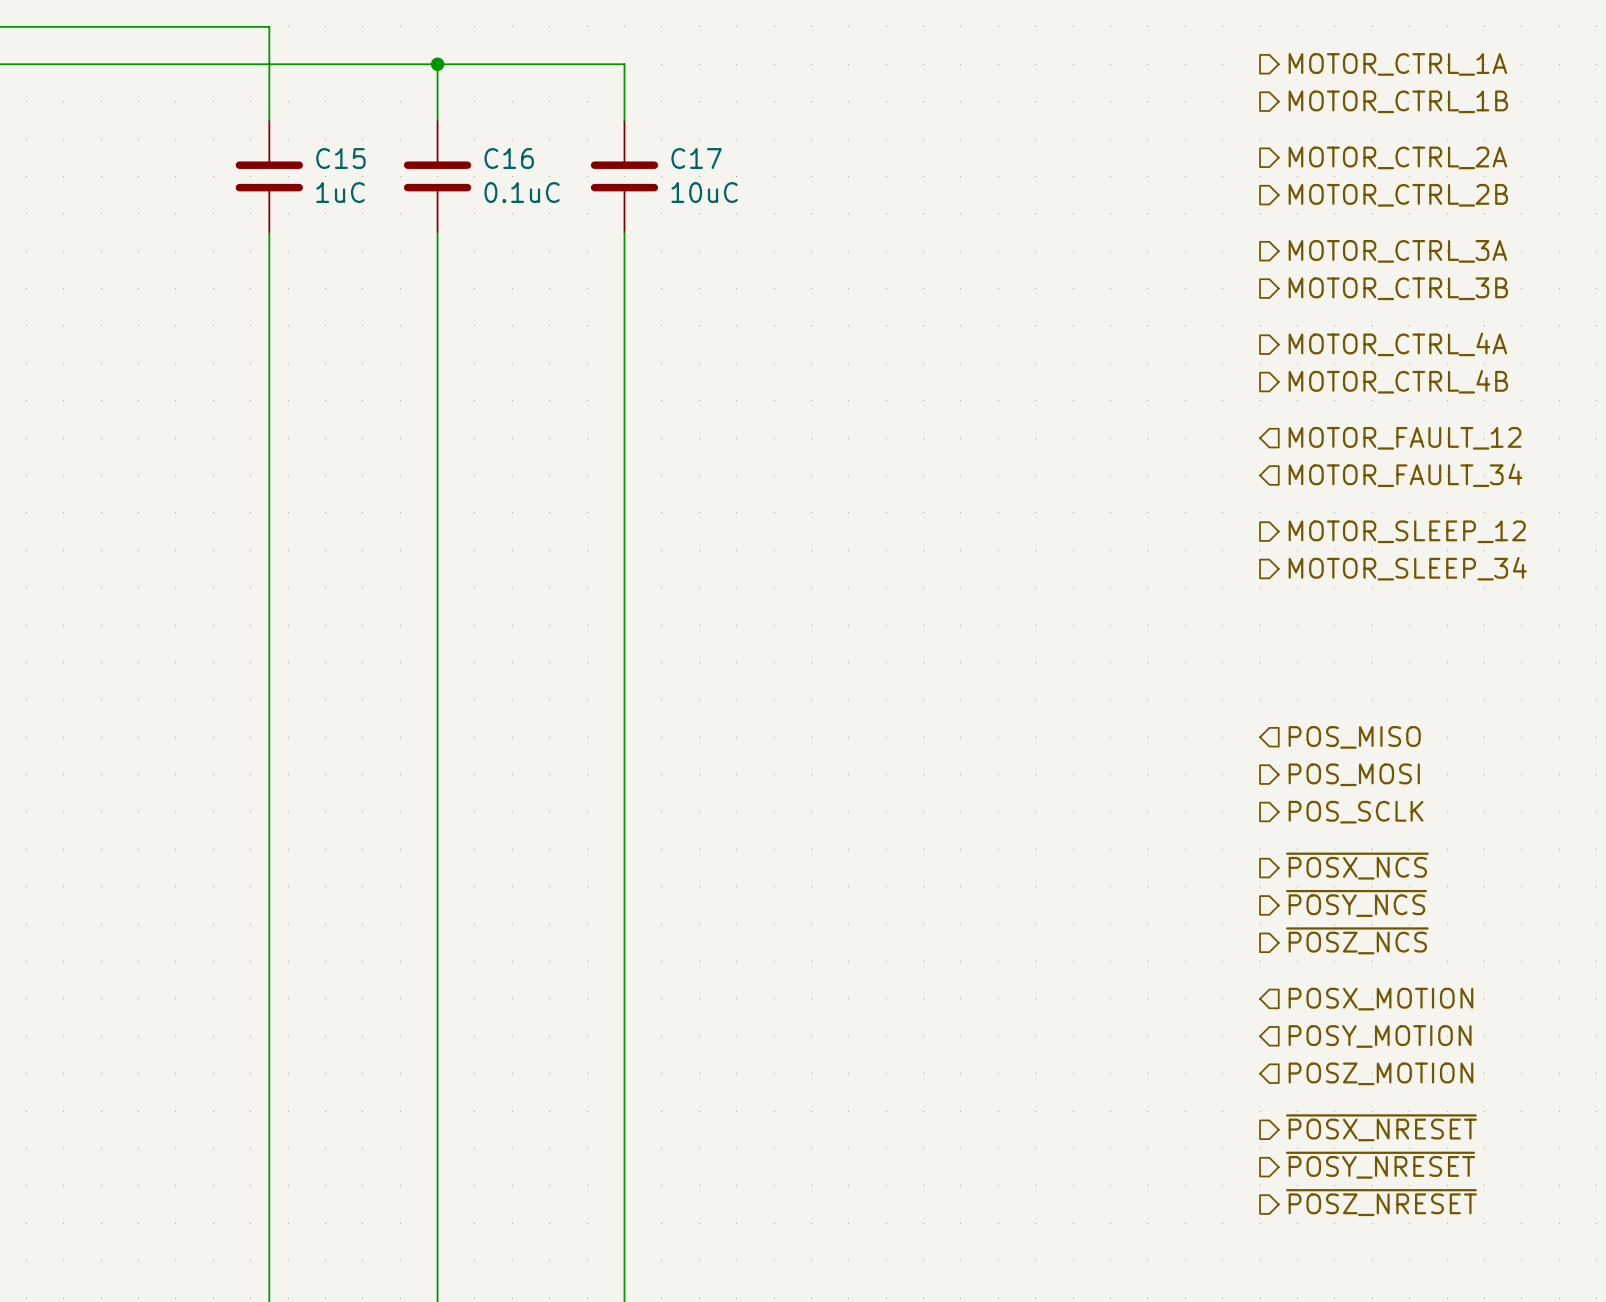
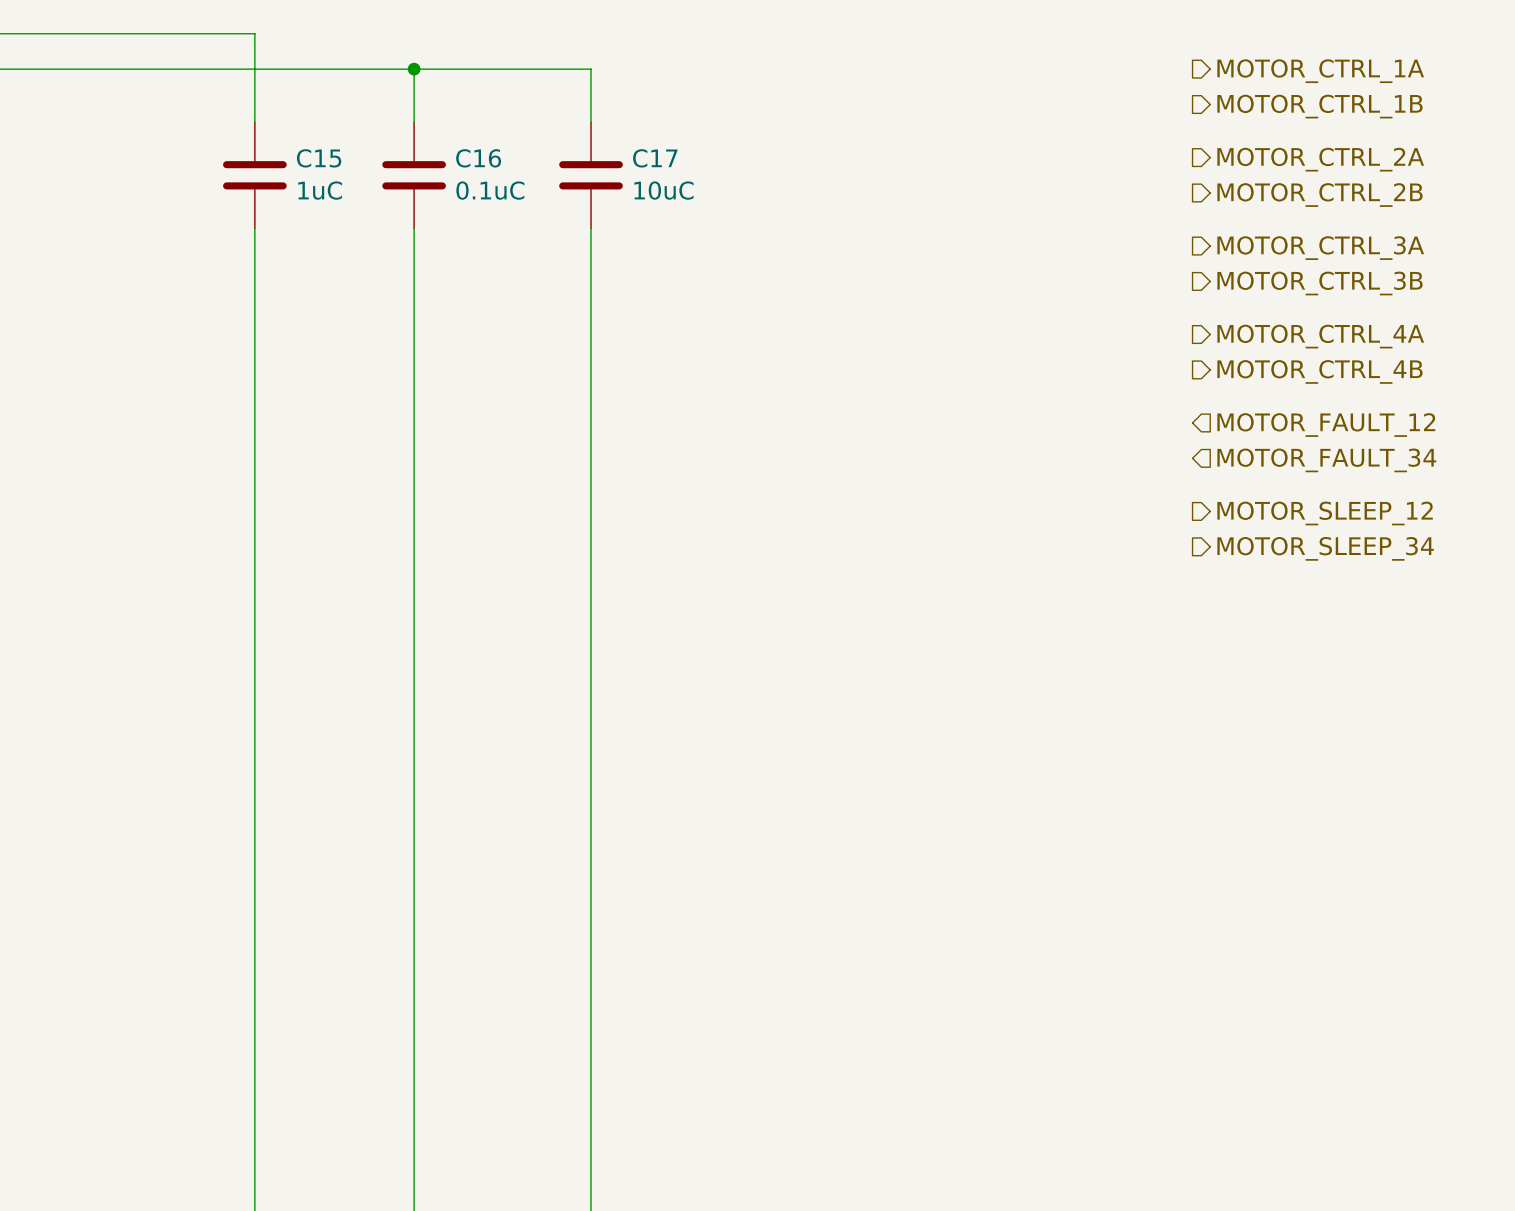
hierarchical label: POS_MISO (1354, 737) -> none
hierarchical label: POS_MOSI (1354, 774) -> none
hierarchical label: POS_SCLK (1356, 812) -> none
hierarchical label: ~{POSX_NCS} (1357, 866) -> none
hierarchical label: ~{POSY_NCS} (1356, 903) -> none
hierarchical label: ~{POSZ_NCS} (1357, 940) -> none
hierarchical label: POSX_MOTION (1380, 999) -> none
hierarchical label: POSY_MOTION (1380, 1036) -> none
hierarchical label: POSZ_MOTION (1380, 1073) -> none
hierarchical label: ~{POSX_NRESET} (1381, 1127) -> none
hierarchical label: ~{POSY_NRESET} (1380, 1165) -> none
hierarchical label: ~{POSZ_NRESET} (1381, 1202) -> none

